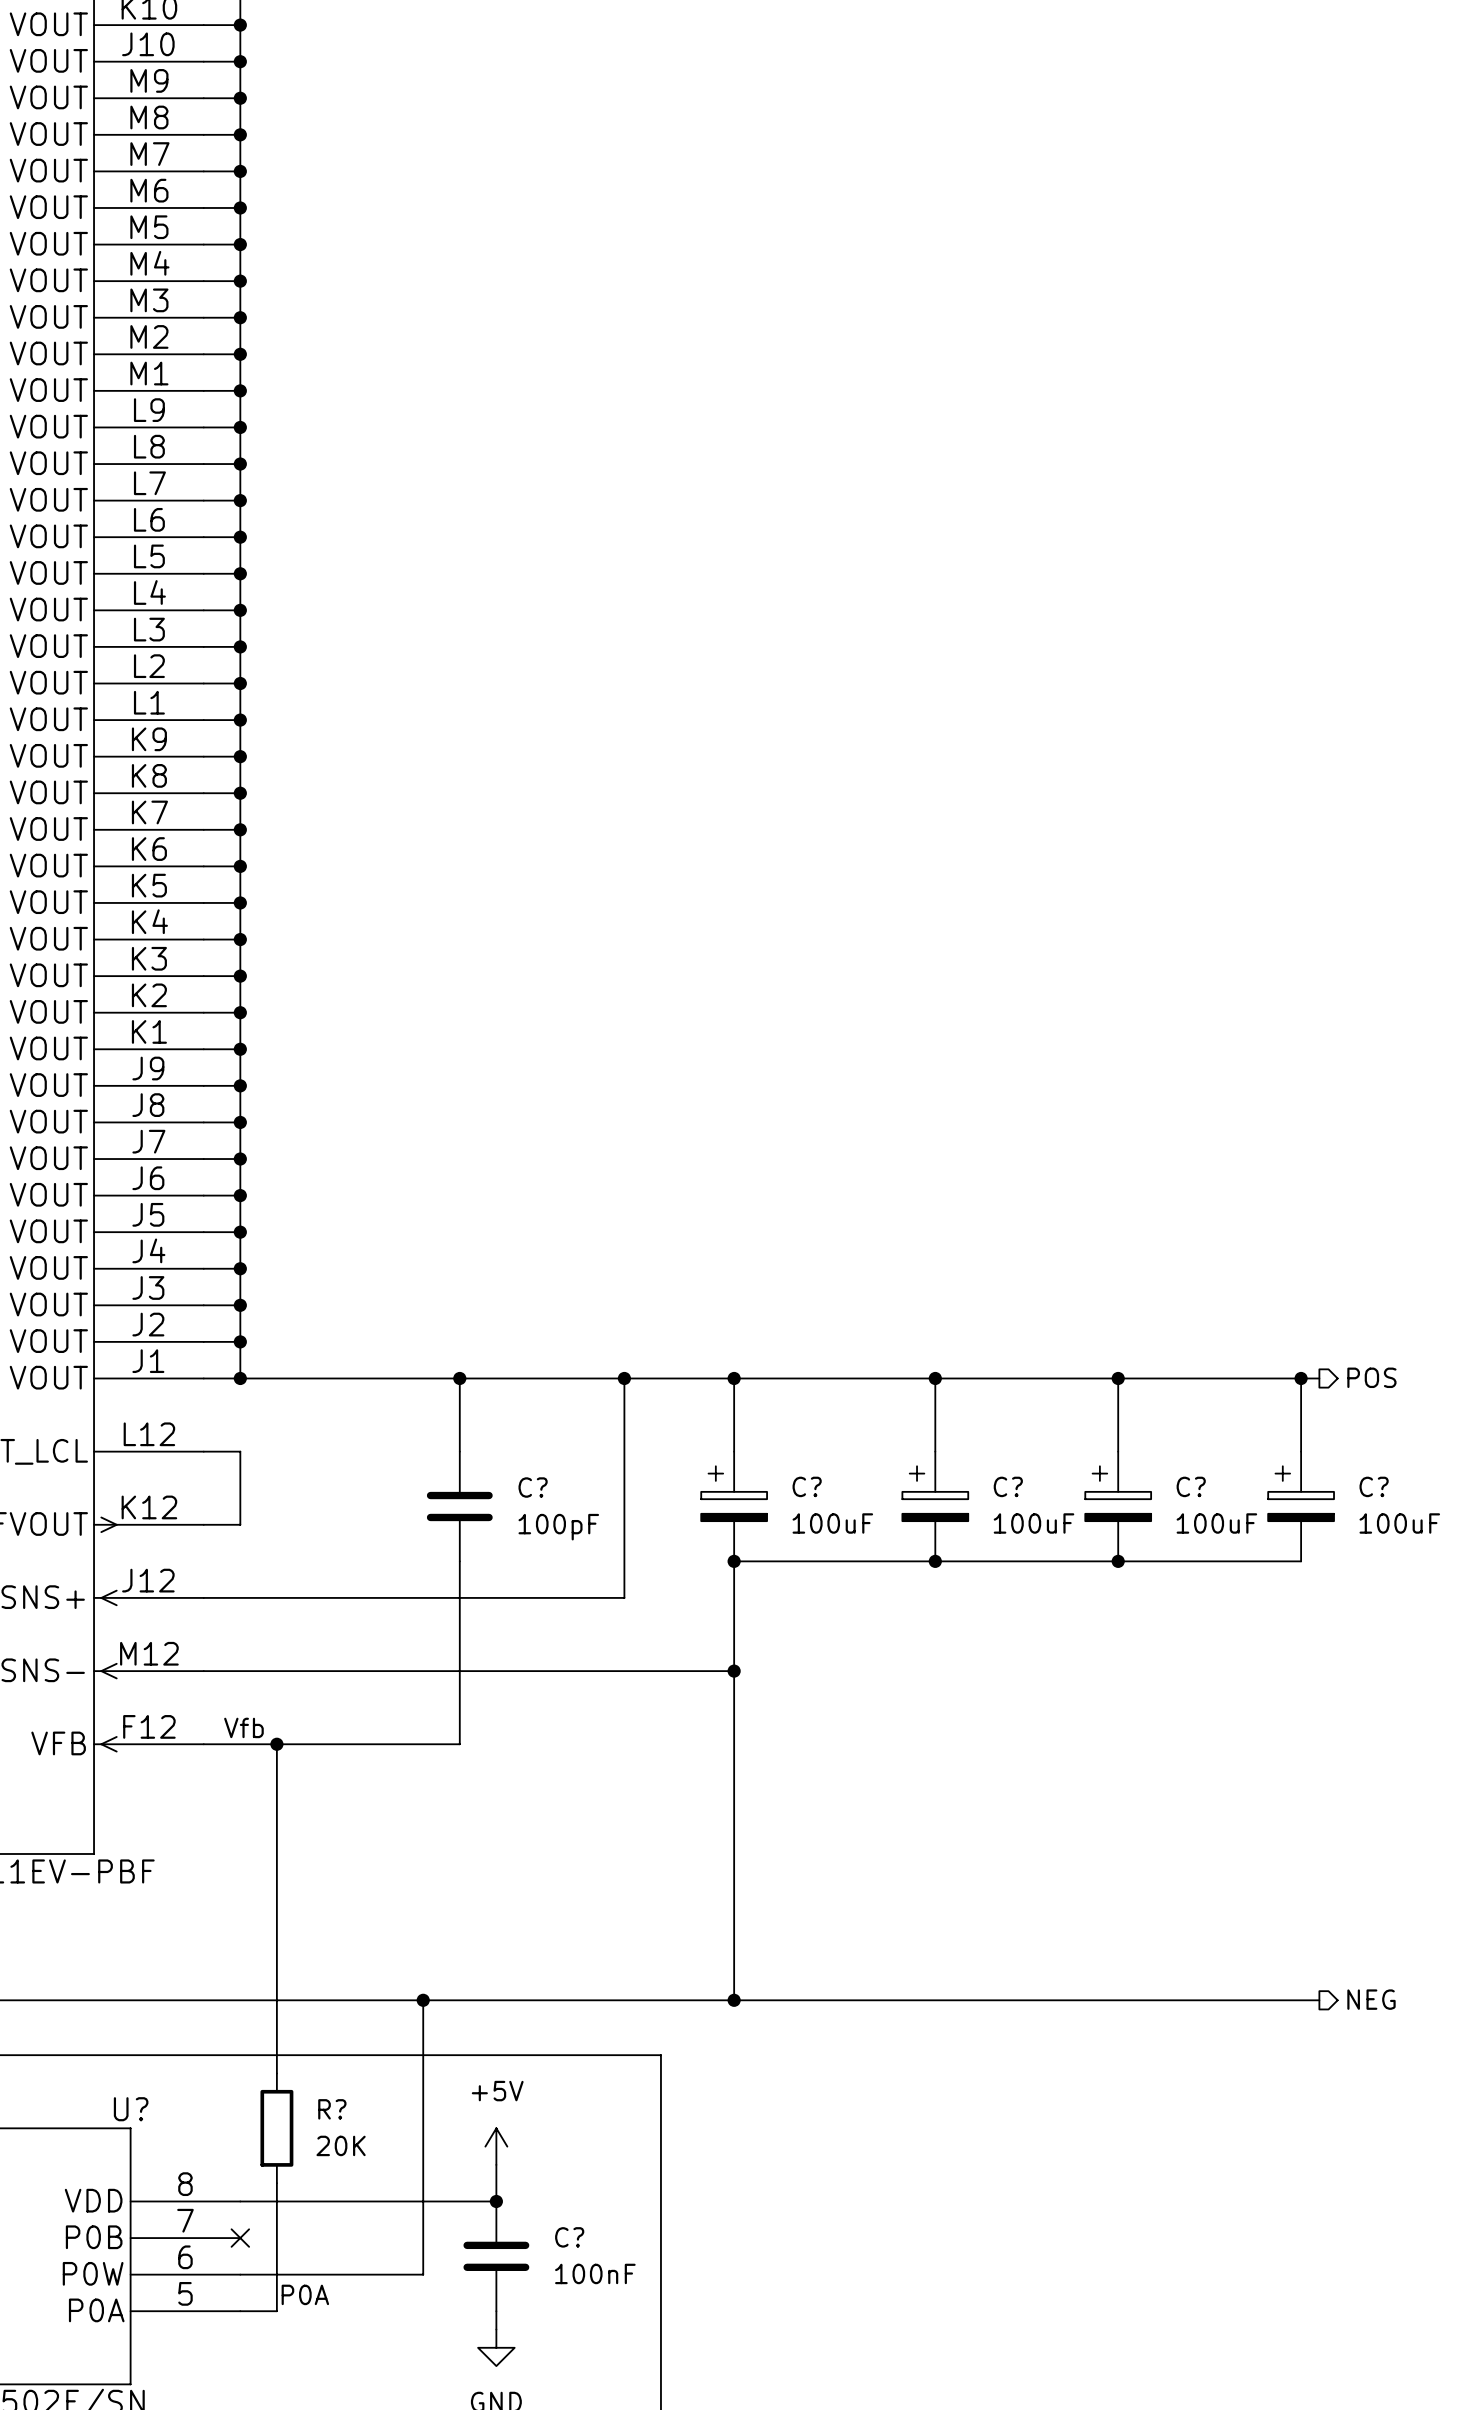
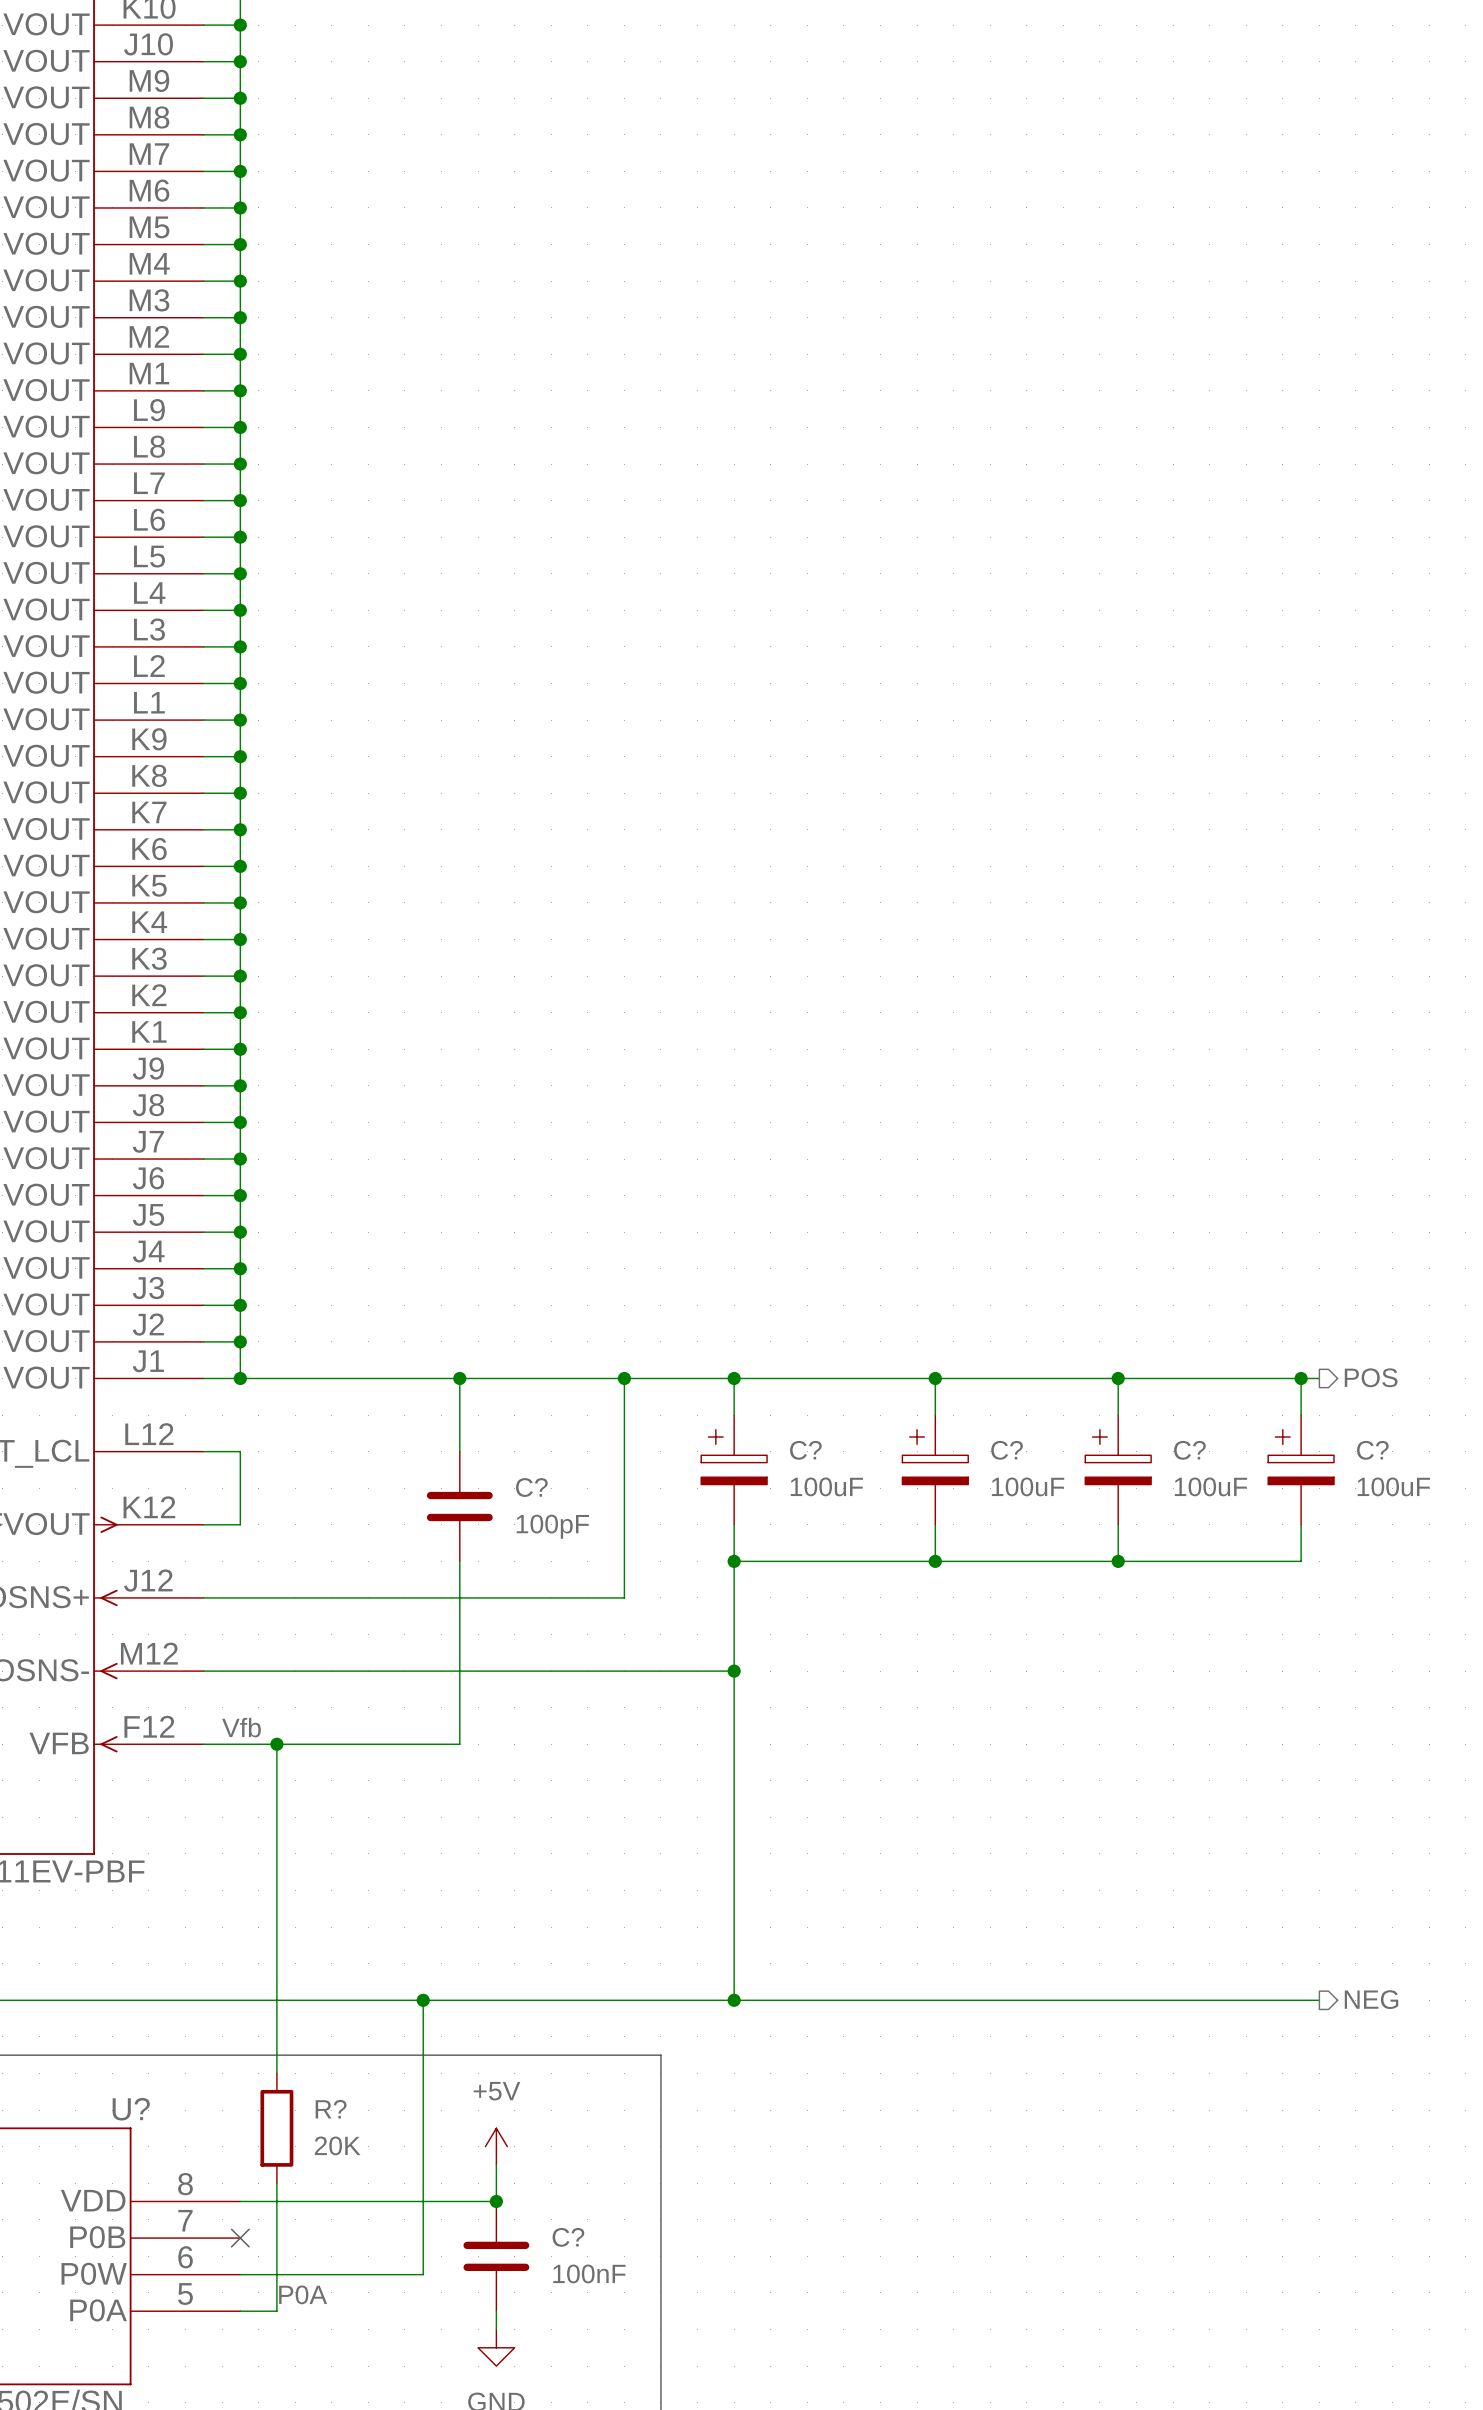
C? position: (734, 1506) -> (734, 1469)
C? position: (935, 1506) -> (935, 1469)
C? position: (1118, 1506) -> (1118, 1469)
C? position: (1301, 1506) -> (1301, 1469)

